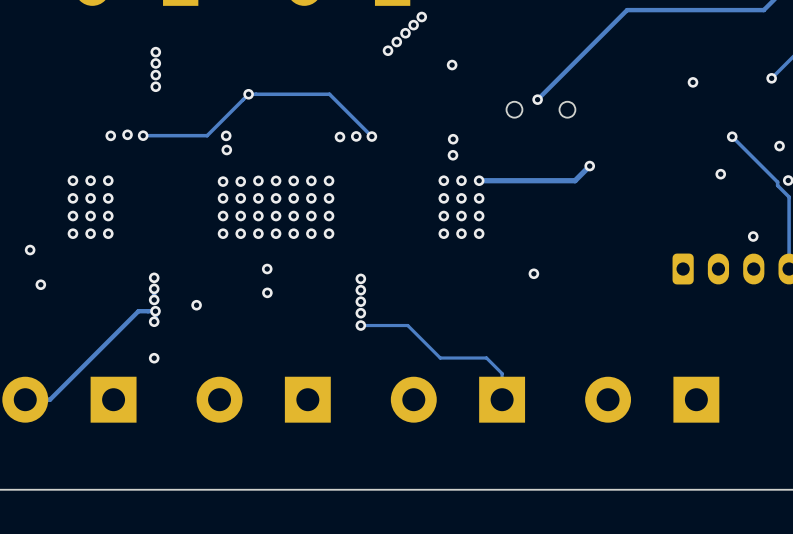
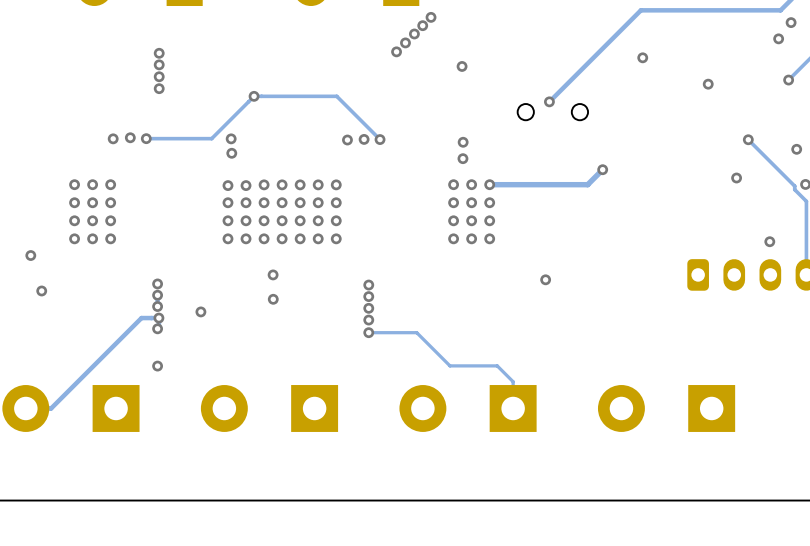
via: none -> (791, 22)
via: none -> (778, 38)
via: none -> (642, 57)

